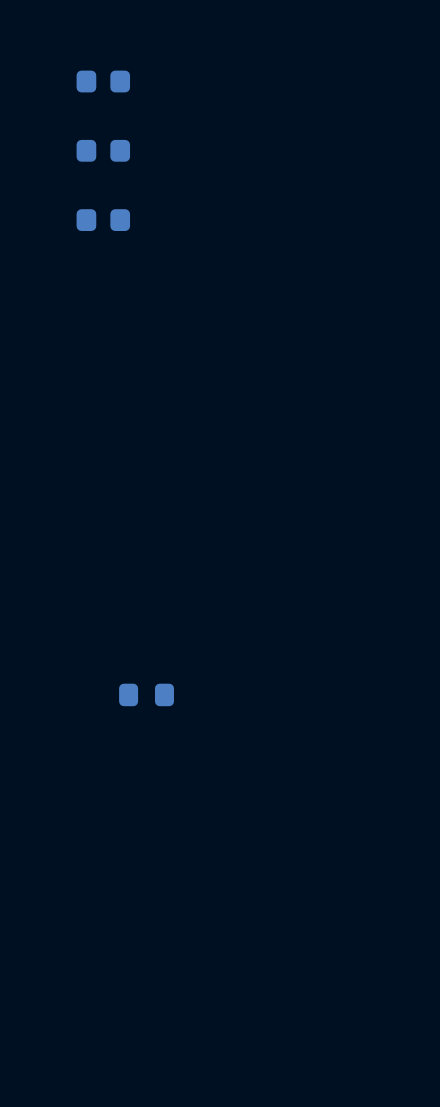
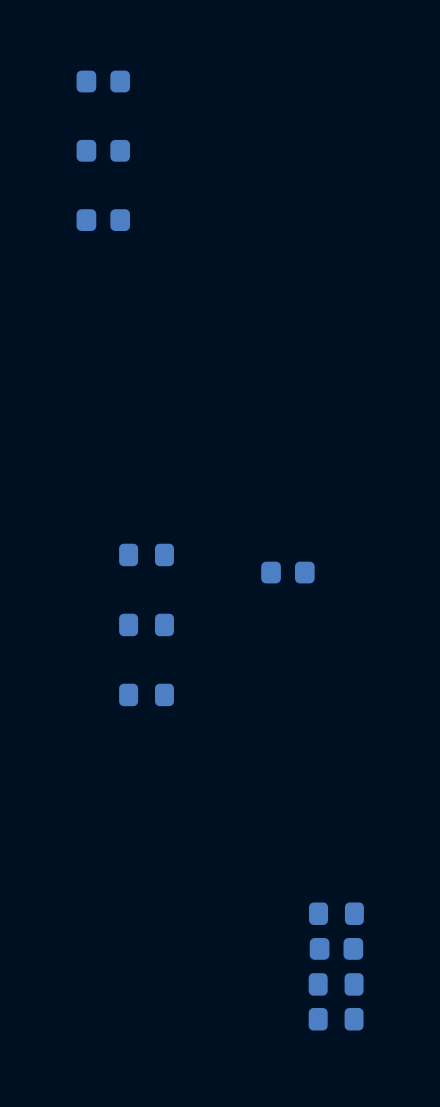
part: none -> (146, 554)
part: none -> (287, 572)
part: none -> (146, 624)
part: none -> (336, 913)
part: none -> (336, 948)
part: none -> (336, 984)
part: none -> (336, 1019)

